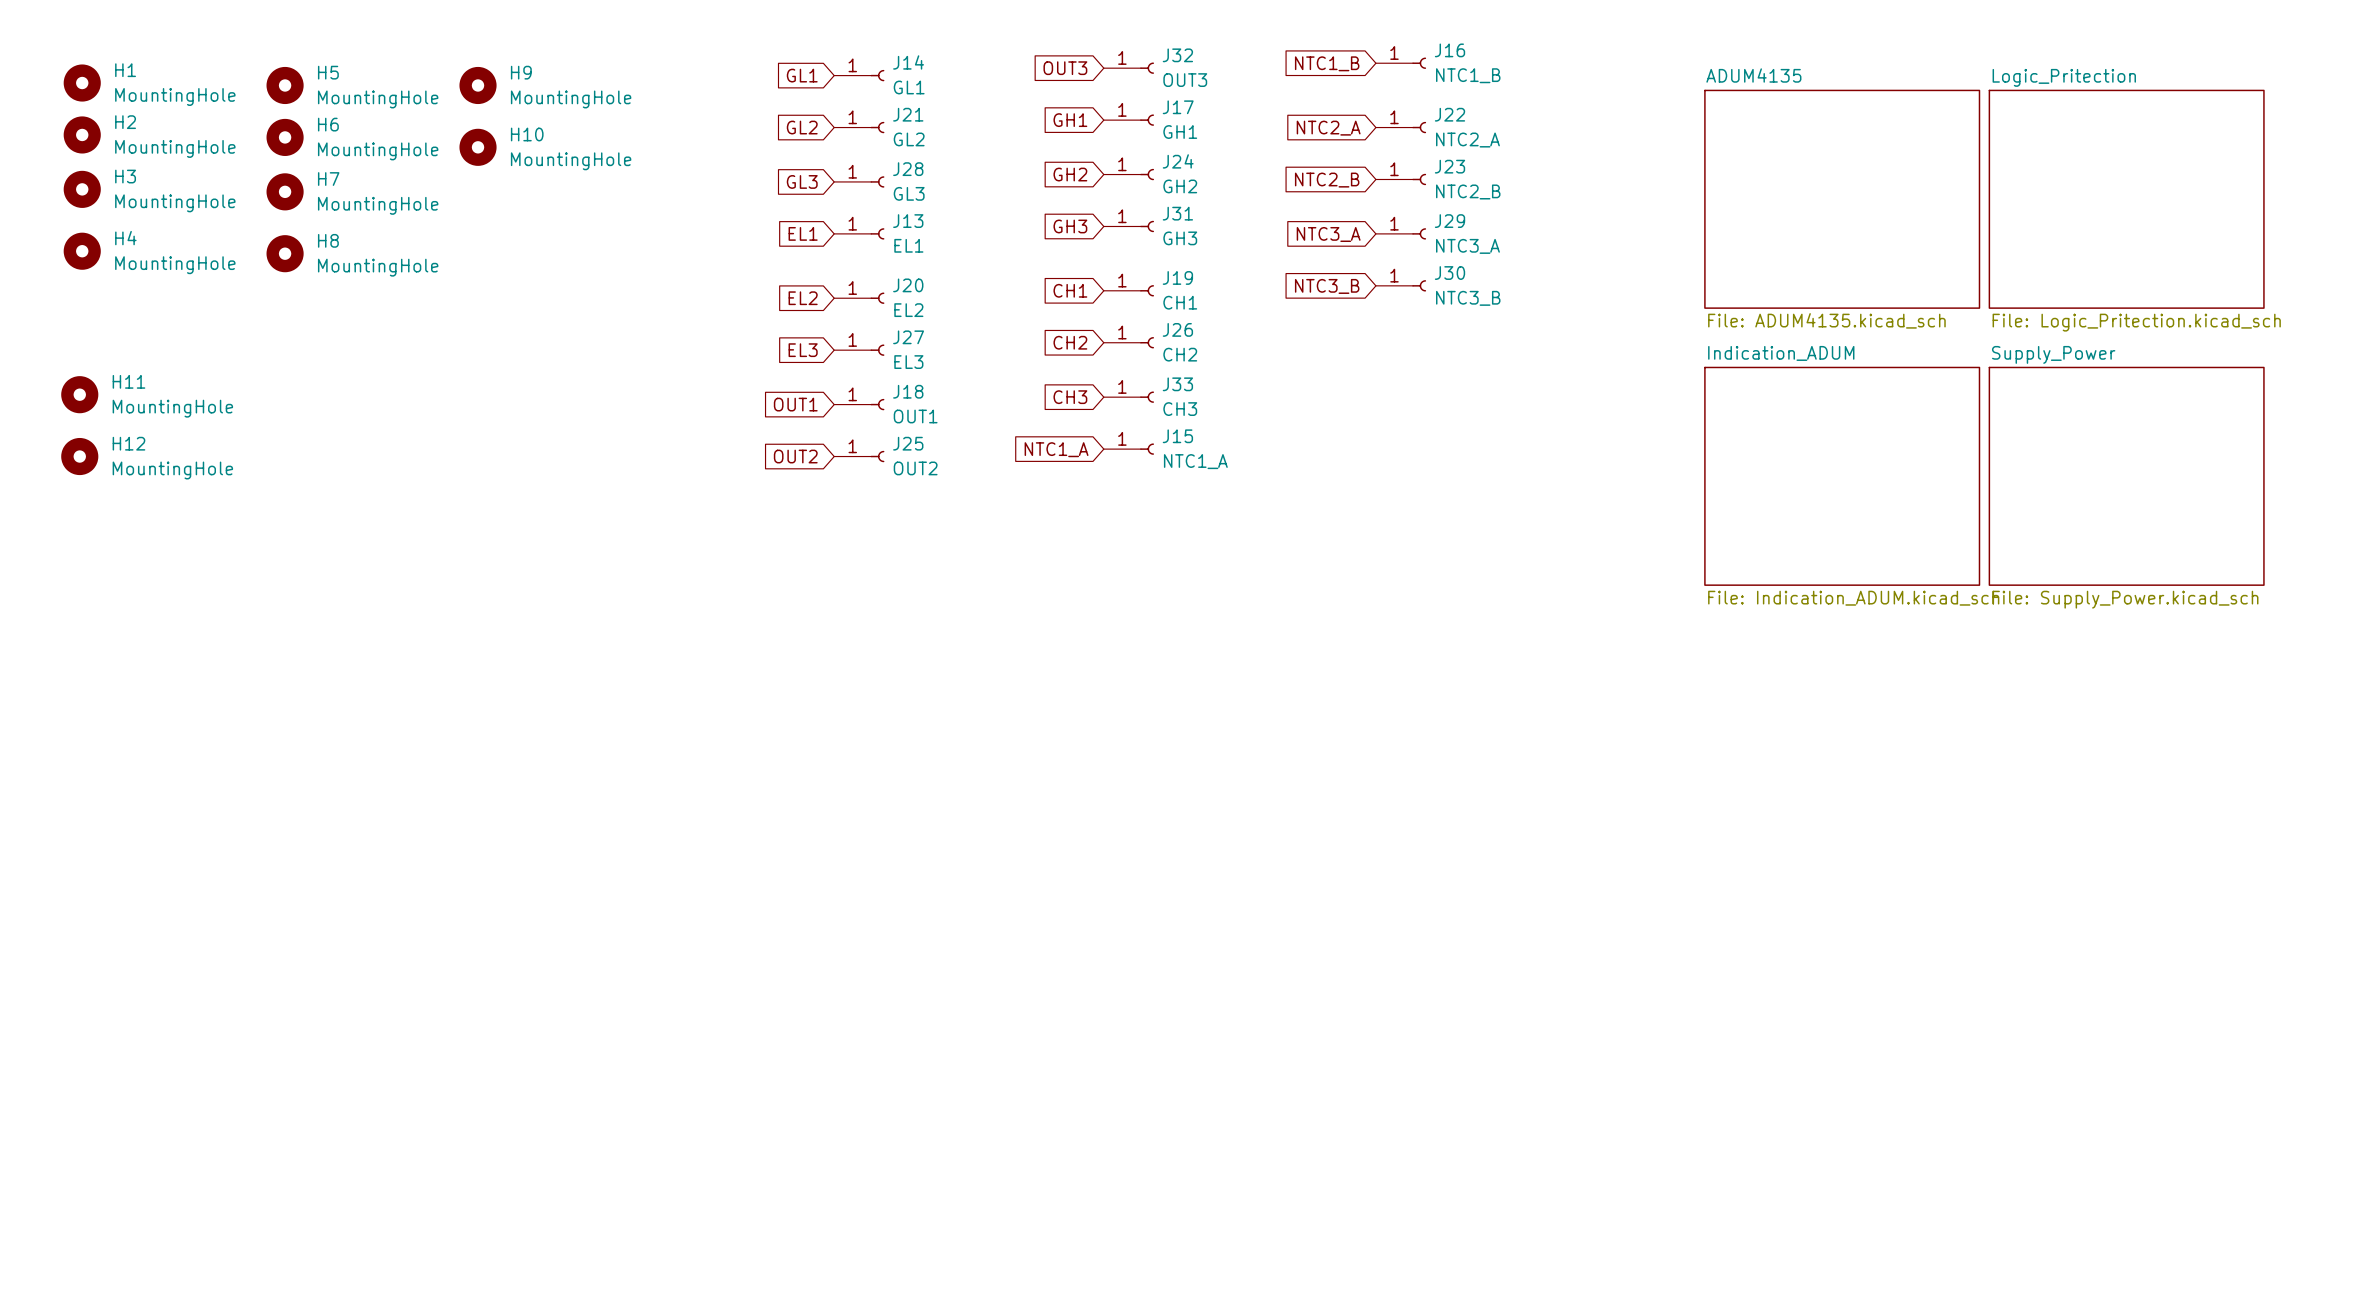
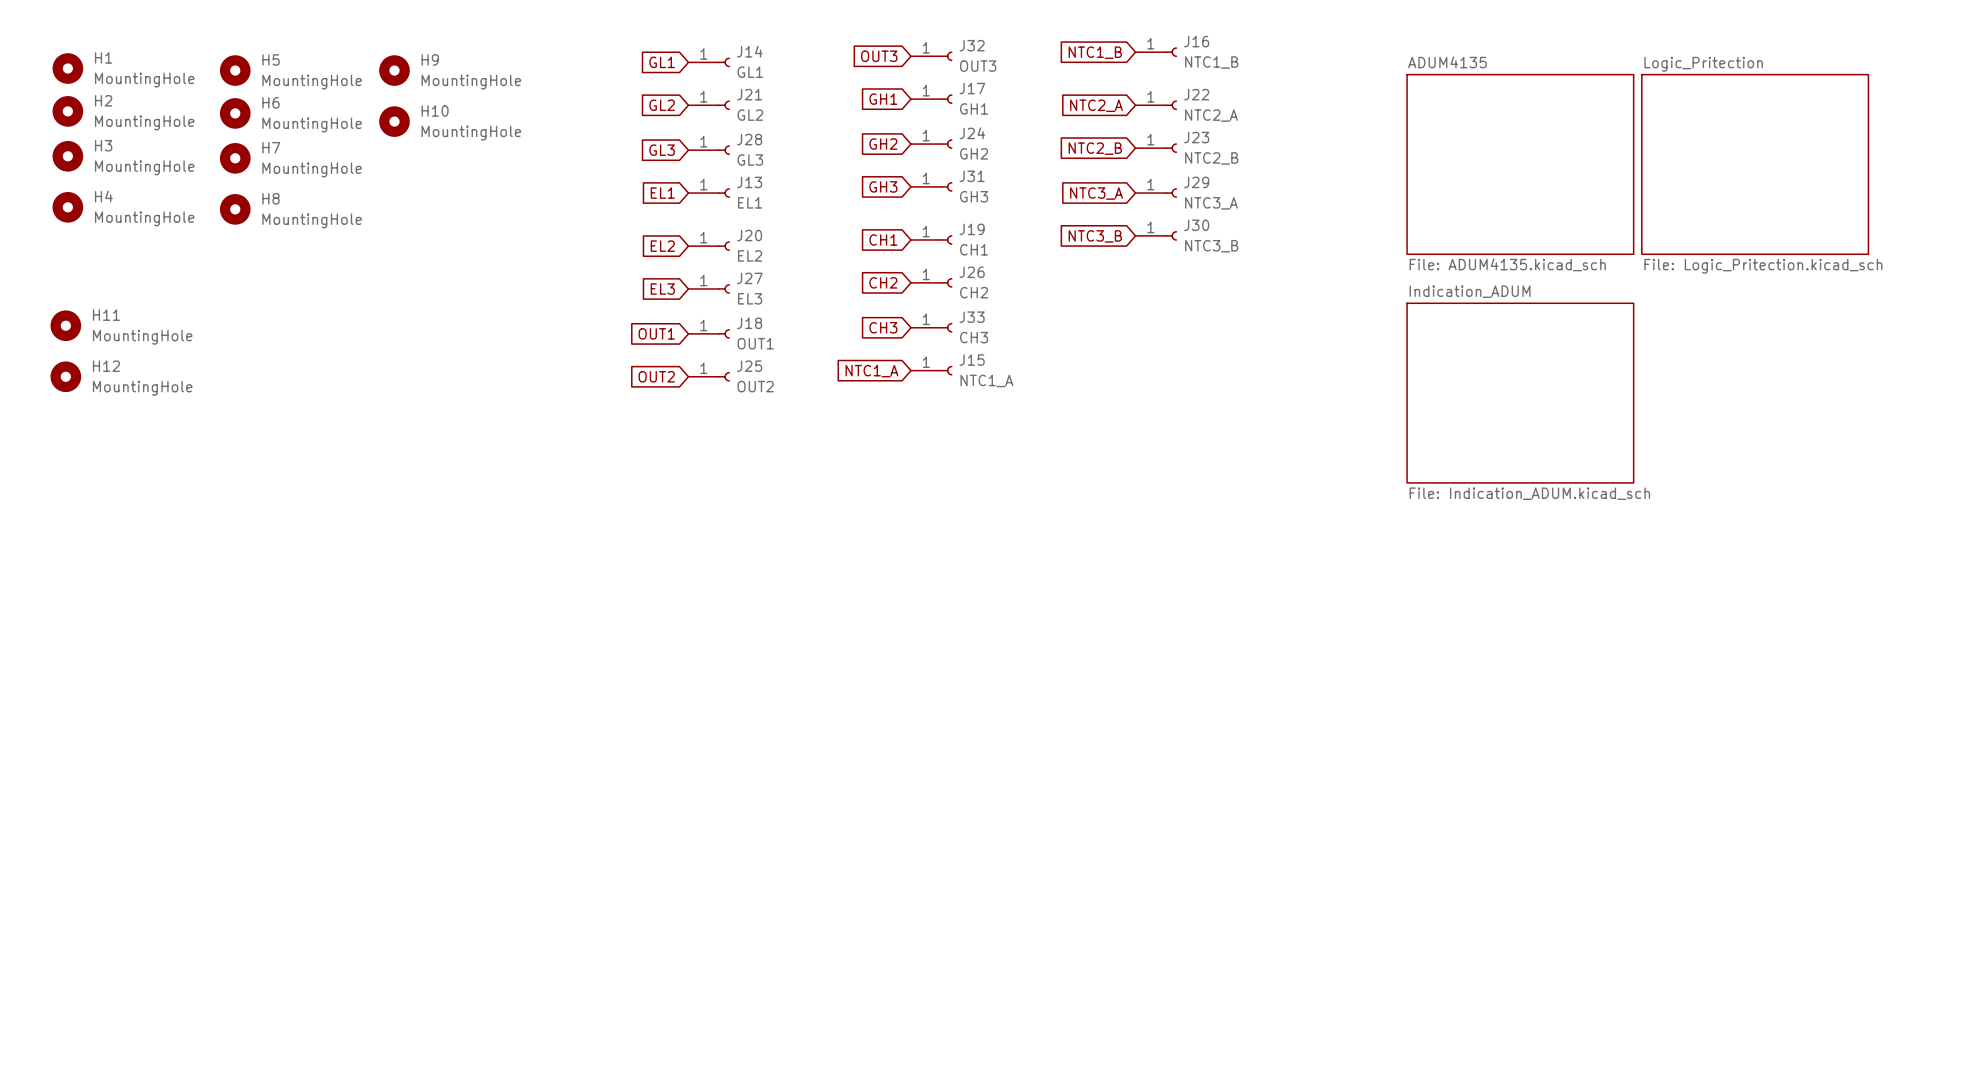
sheet Supply_Power: File: Supply_Power.kicad_sch (2126, 476) -> none

